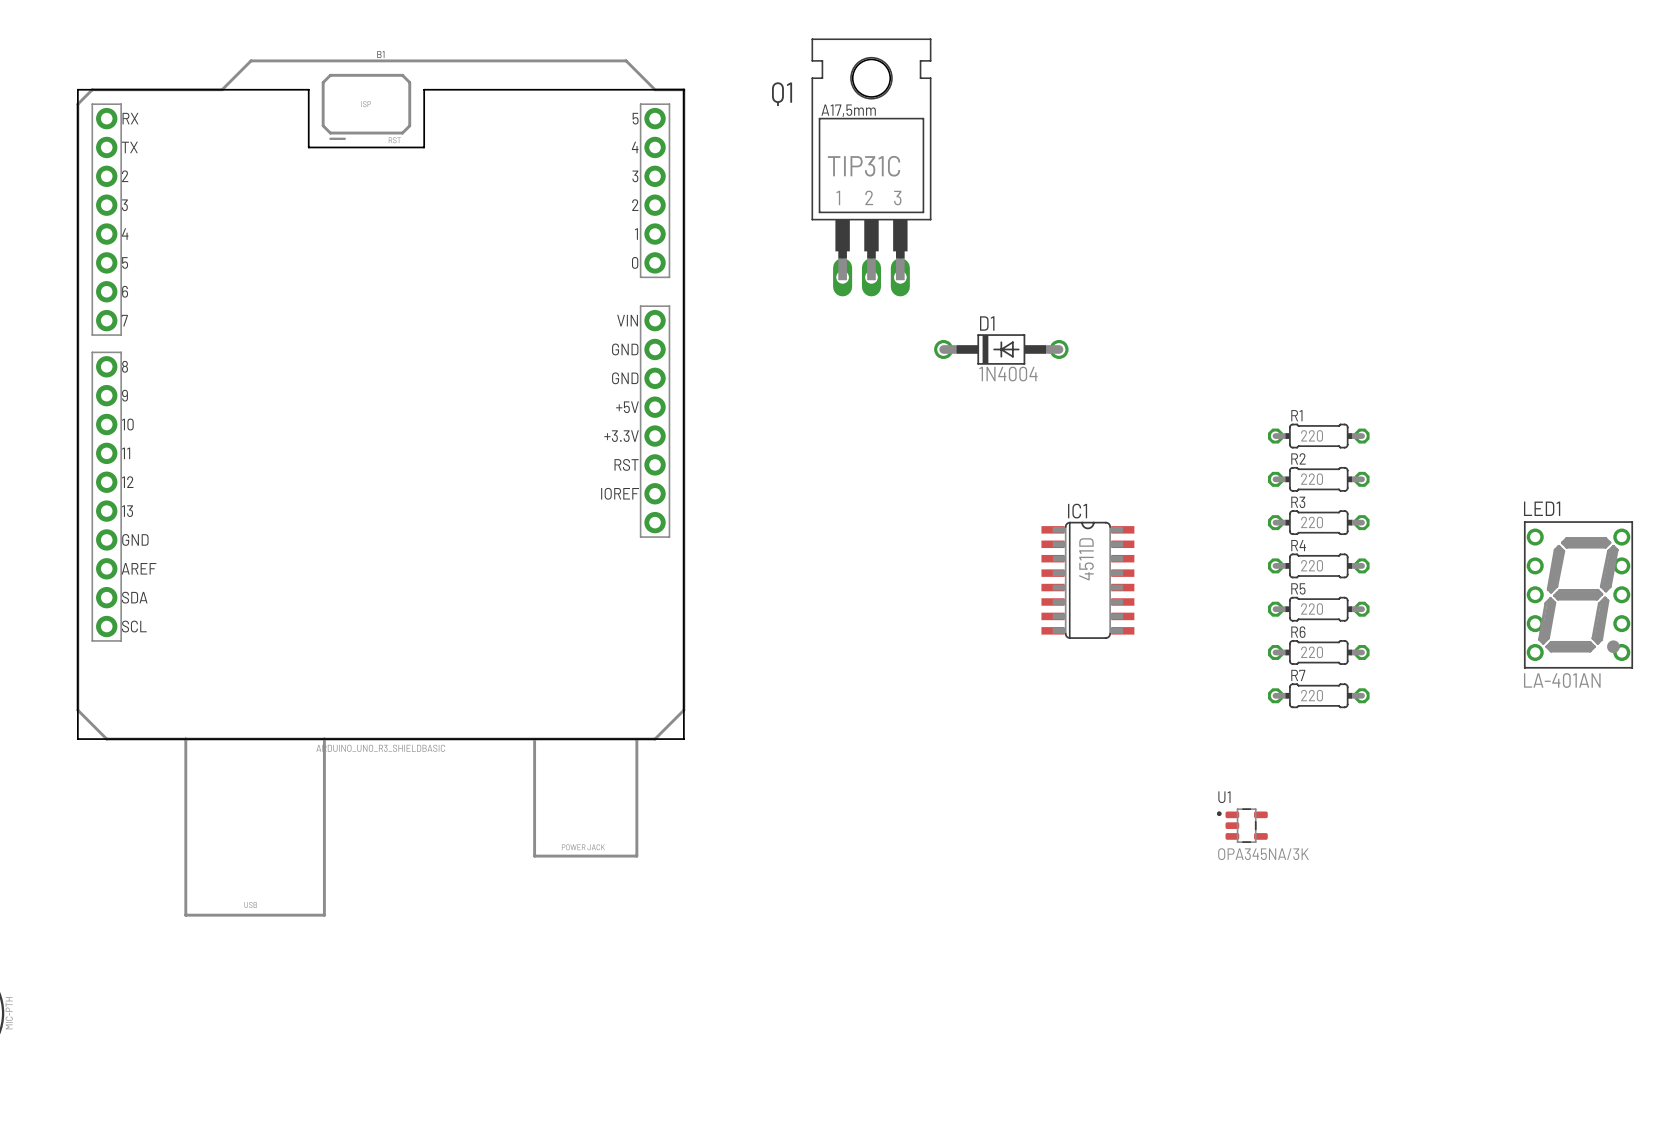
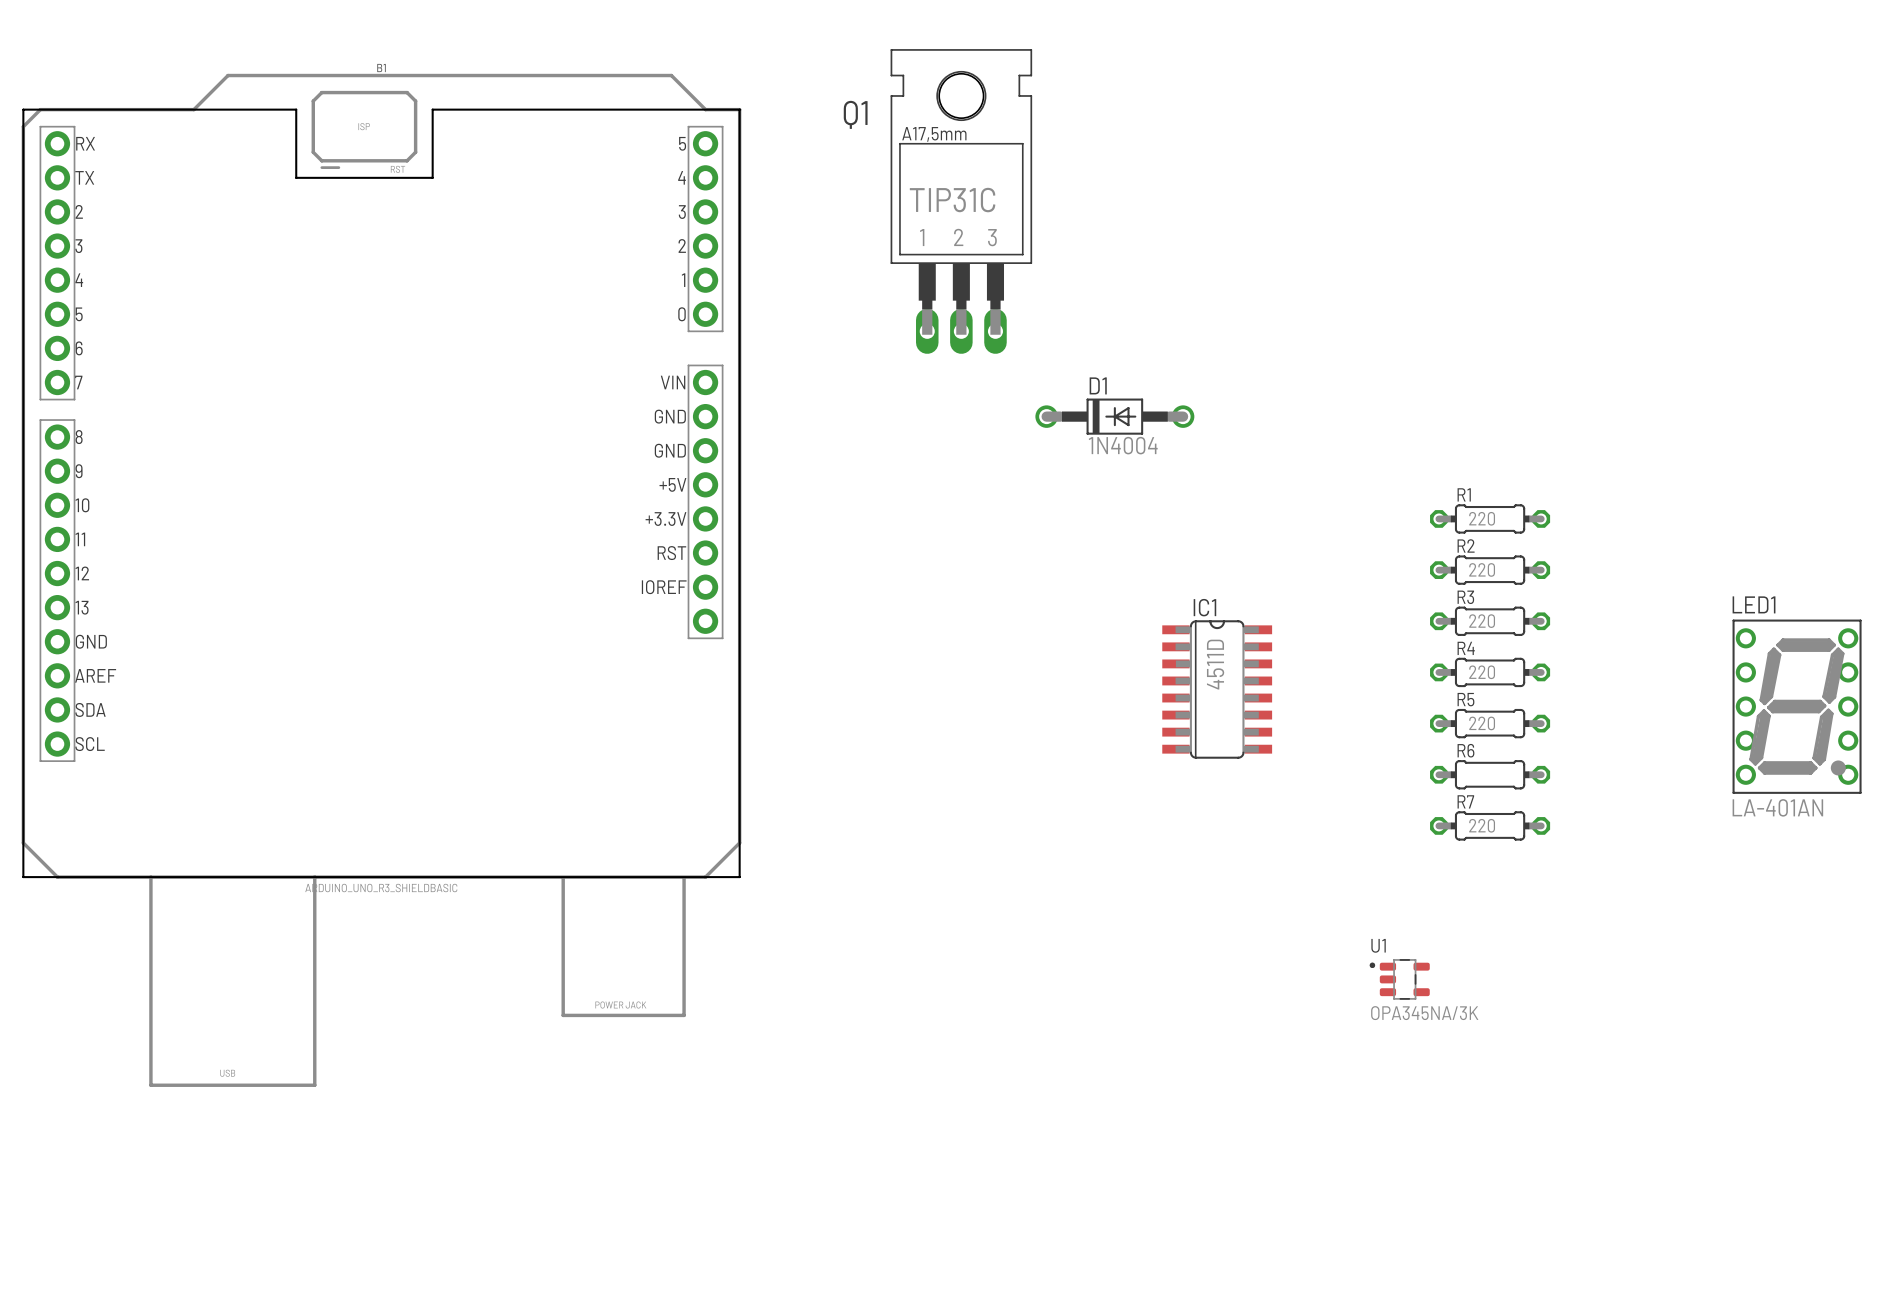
R6 value: 220 (1312, 652) -> none

